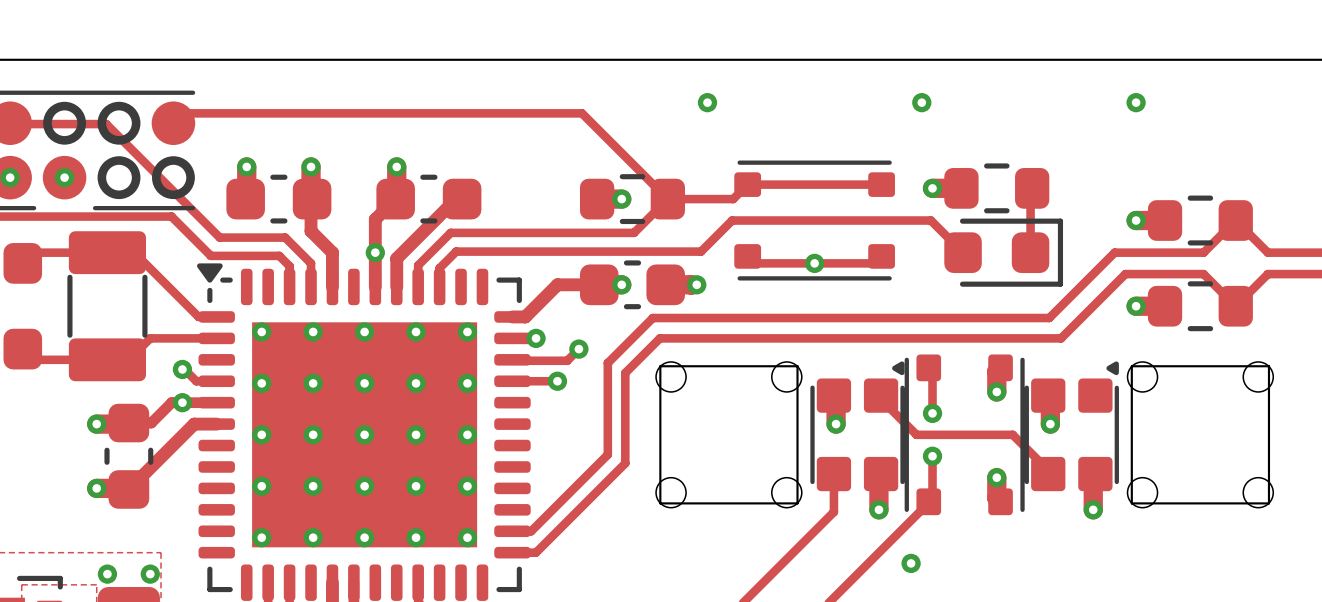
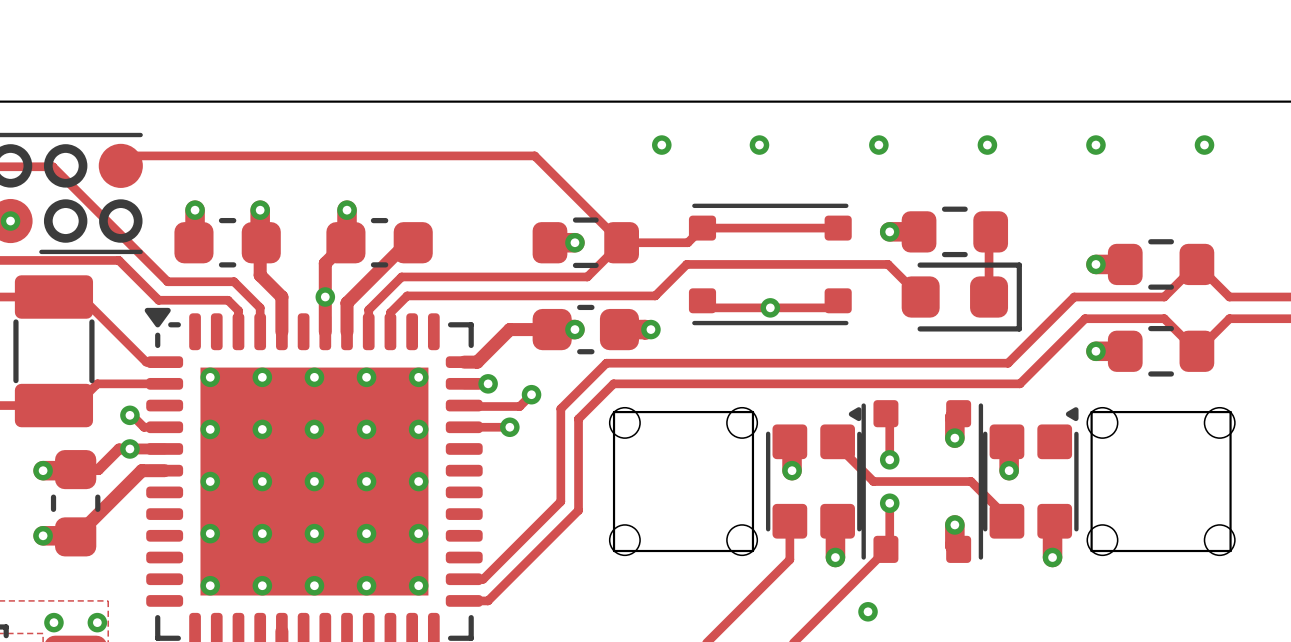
via: none -> (759, 145)
via: none -> (987, 145)
via: none -> (1204, 145)

